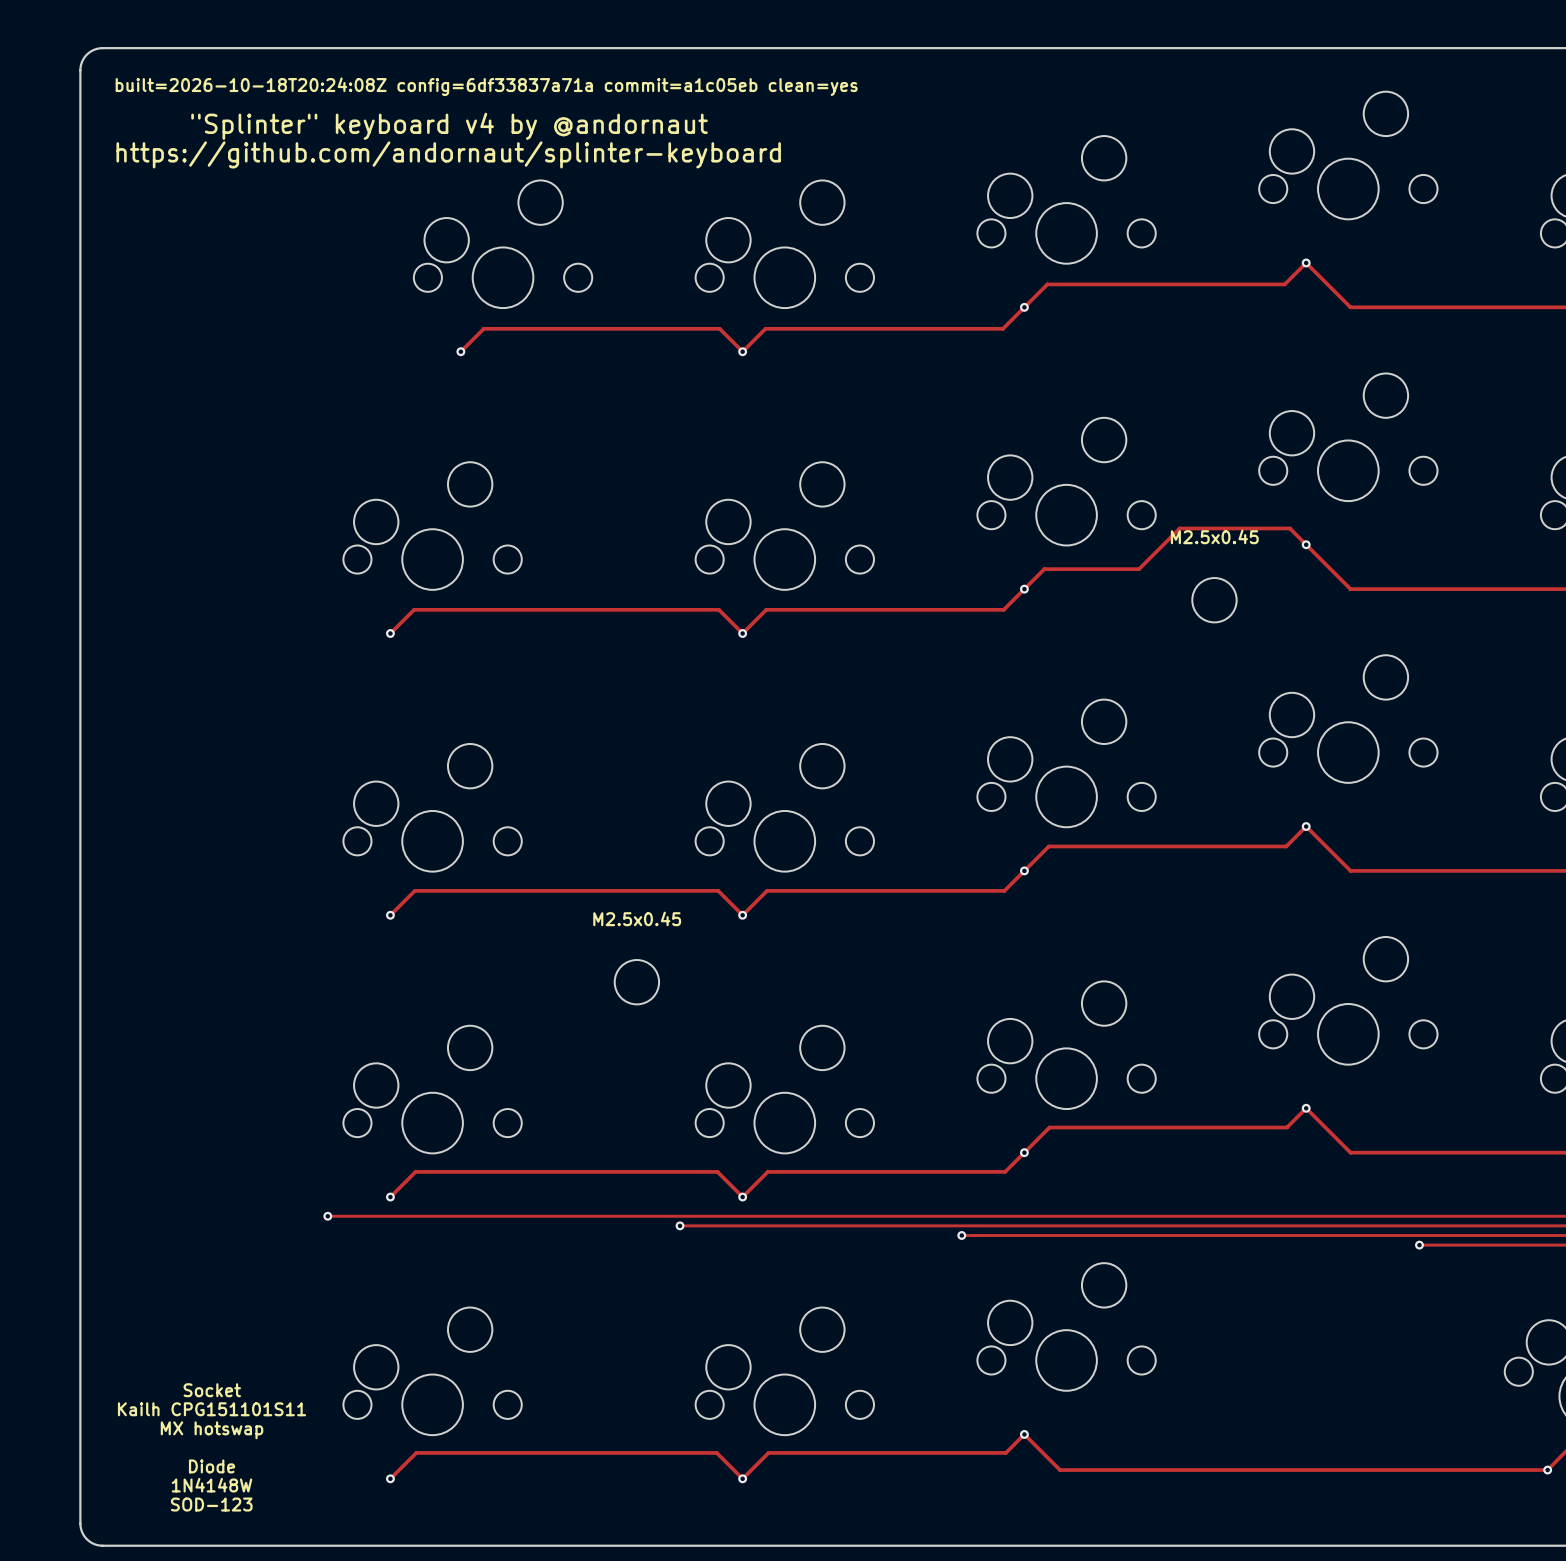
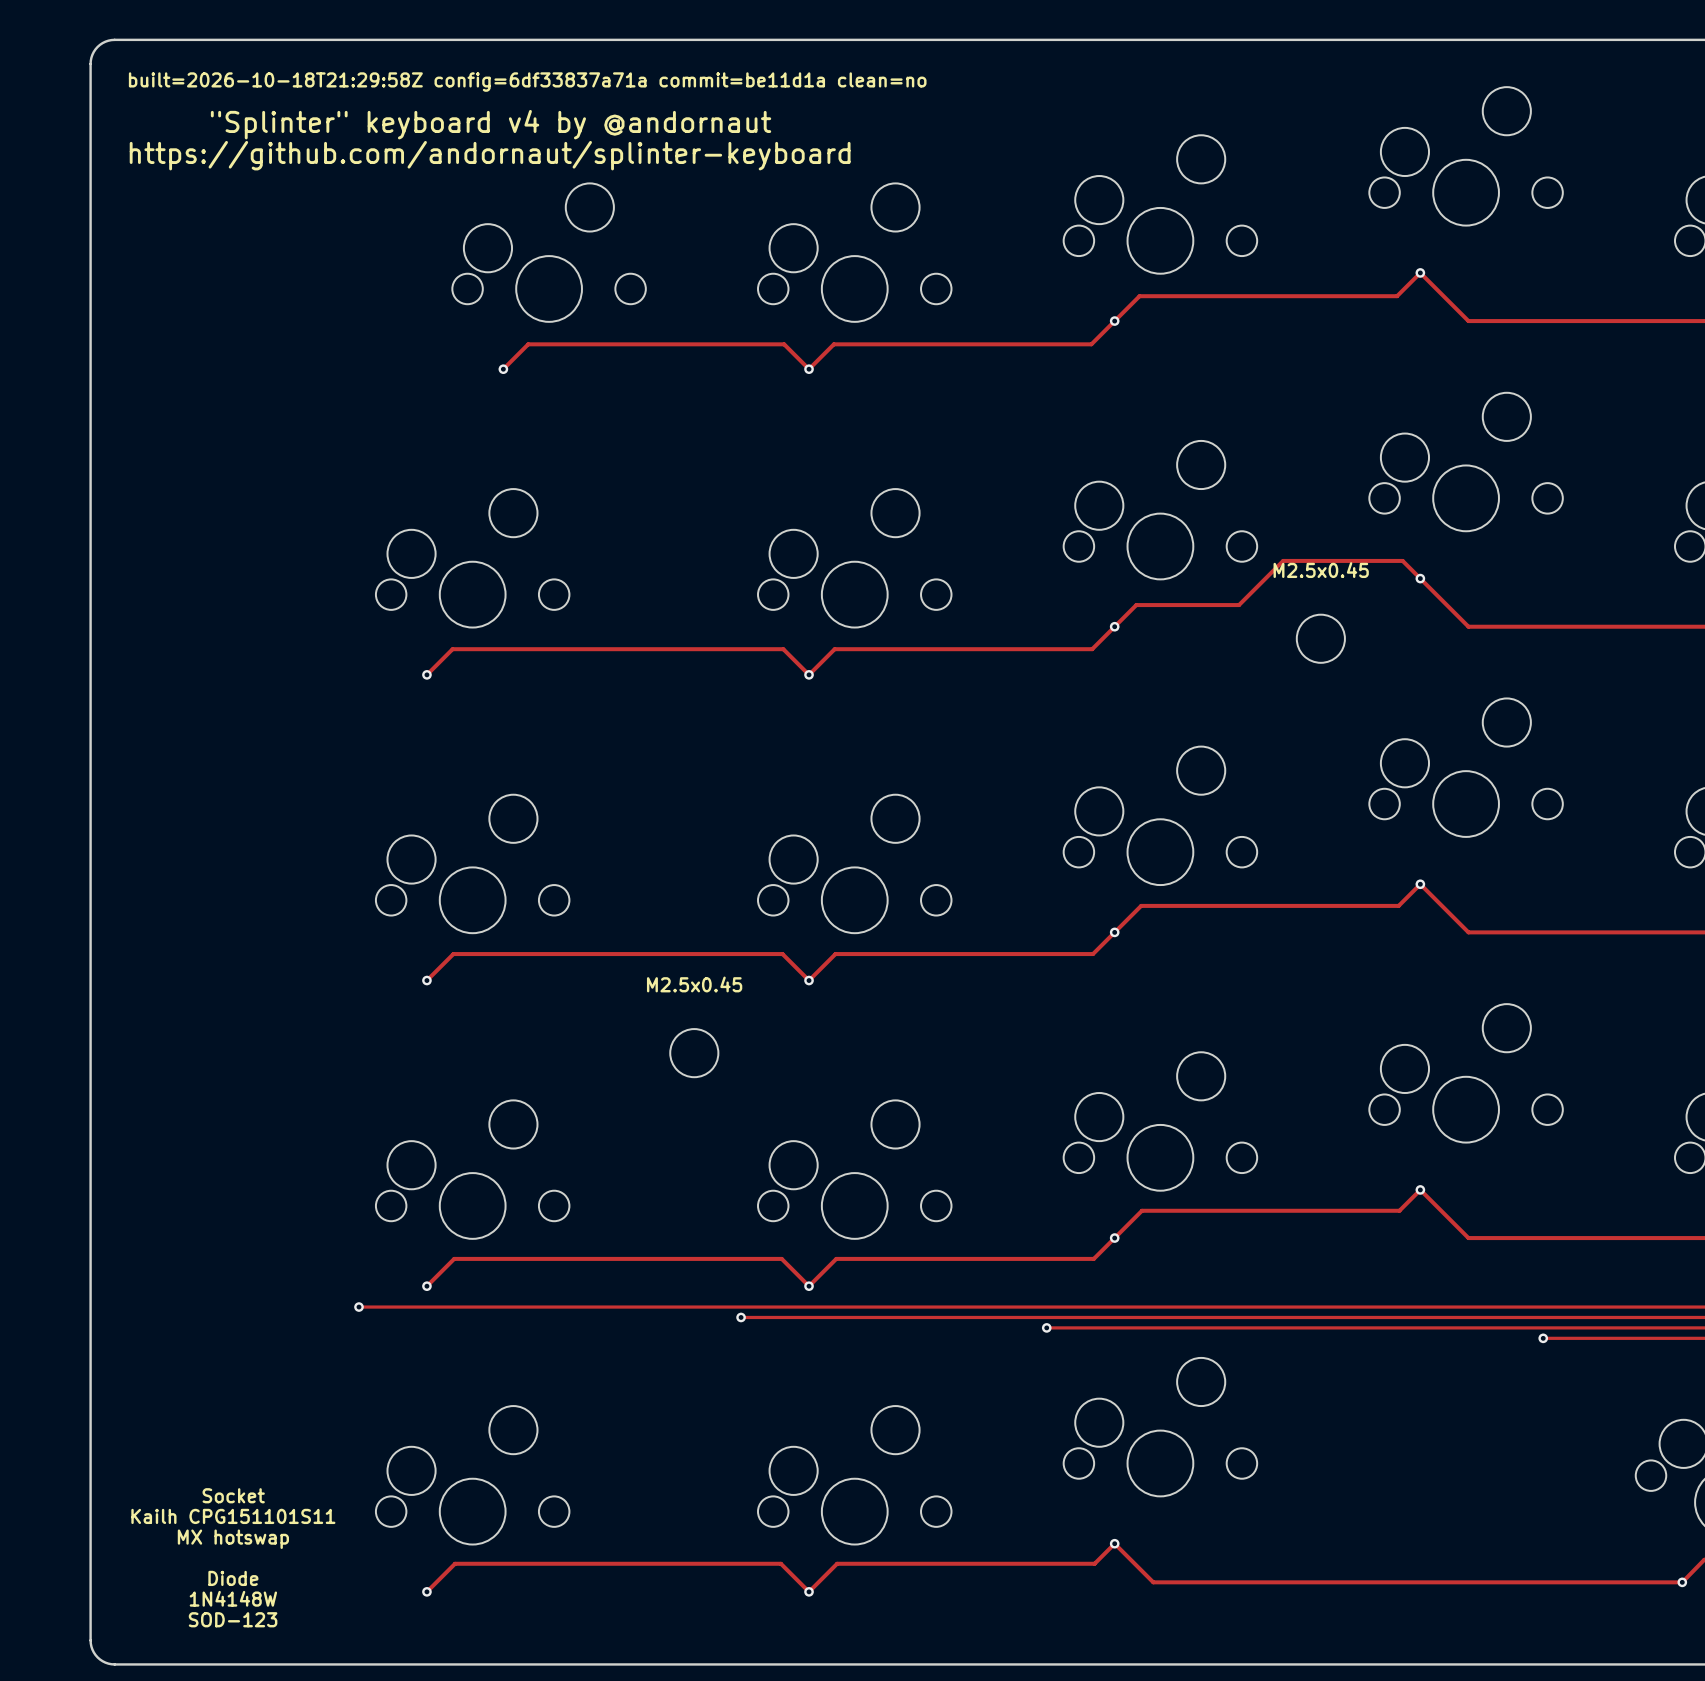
text: built=2026-10-18T20:24:08Z config=6df33837a71a commit=a1c05eb clean=yes (486, 86) -> built=2026-10-18T21:29:58Z config=6df33837a71a commit=be11d1a clean=no (527, 82)

